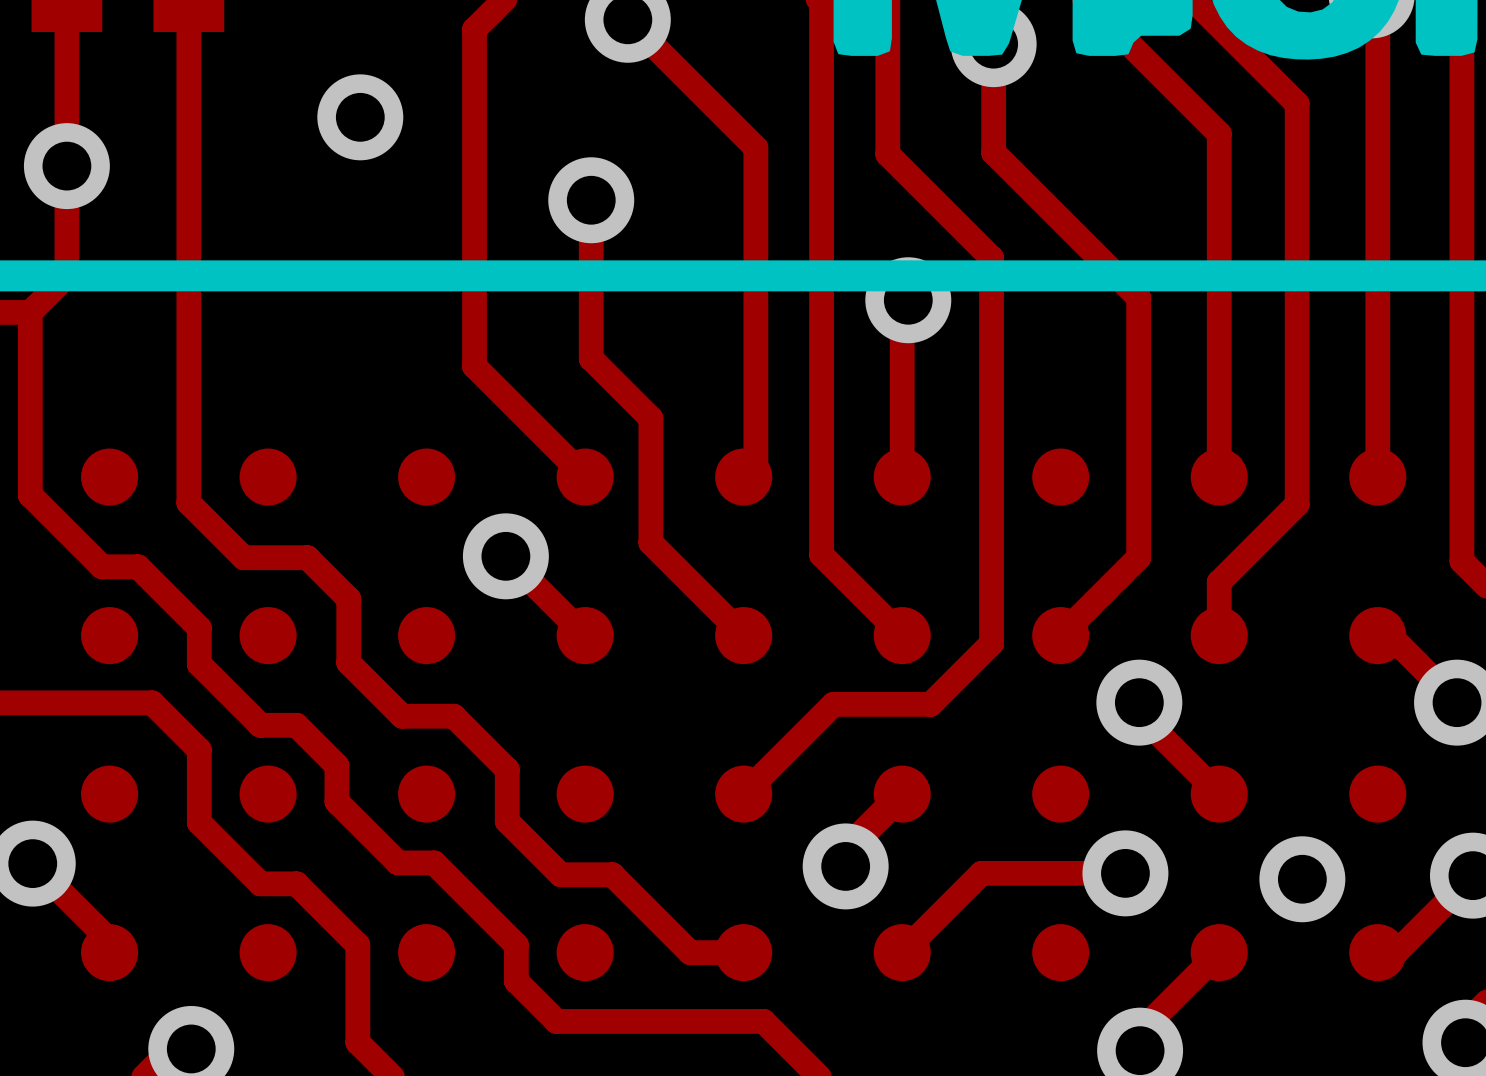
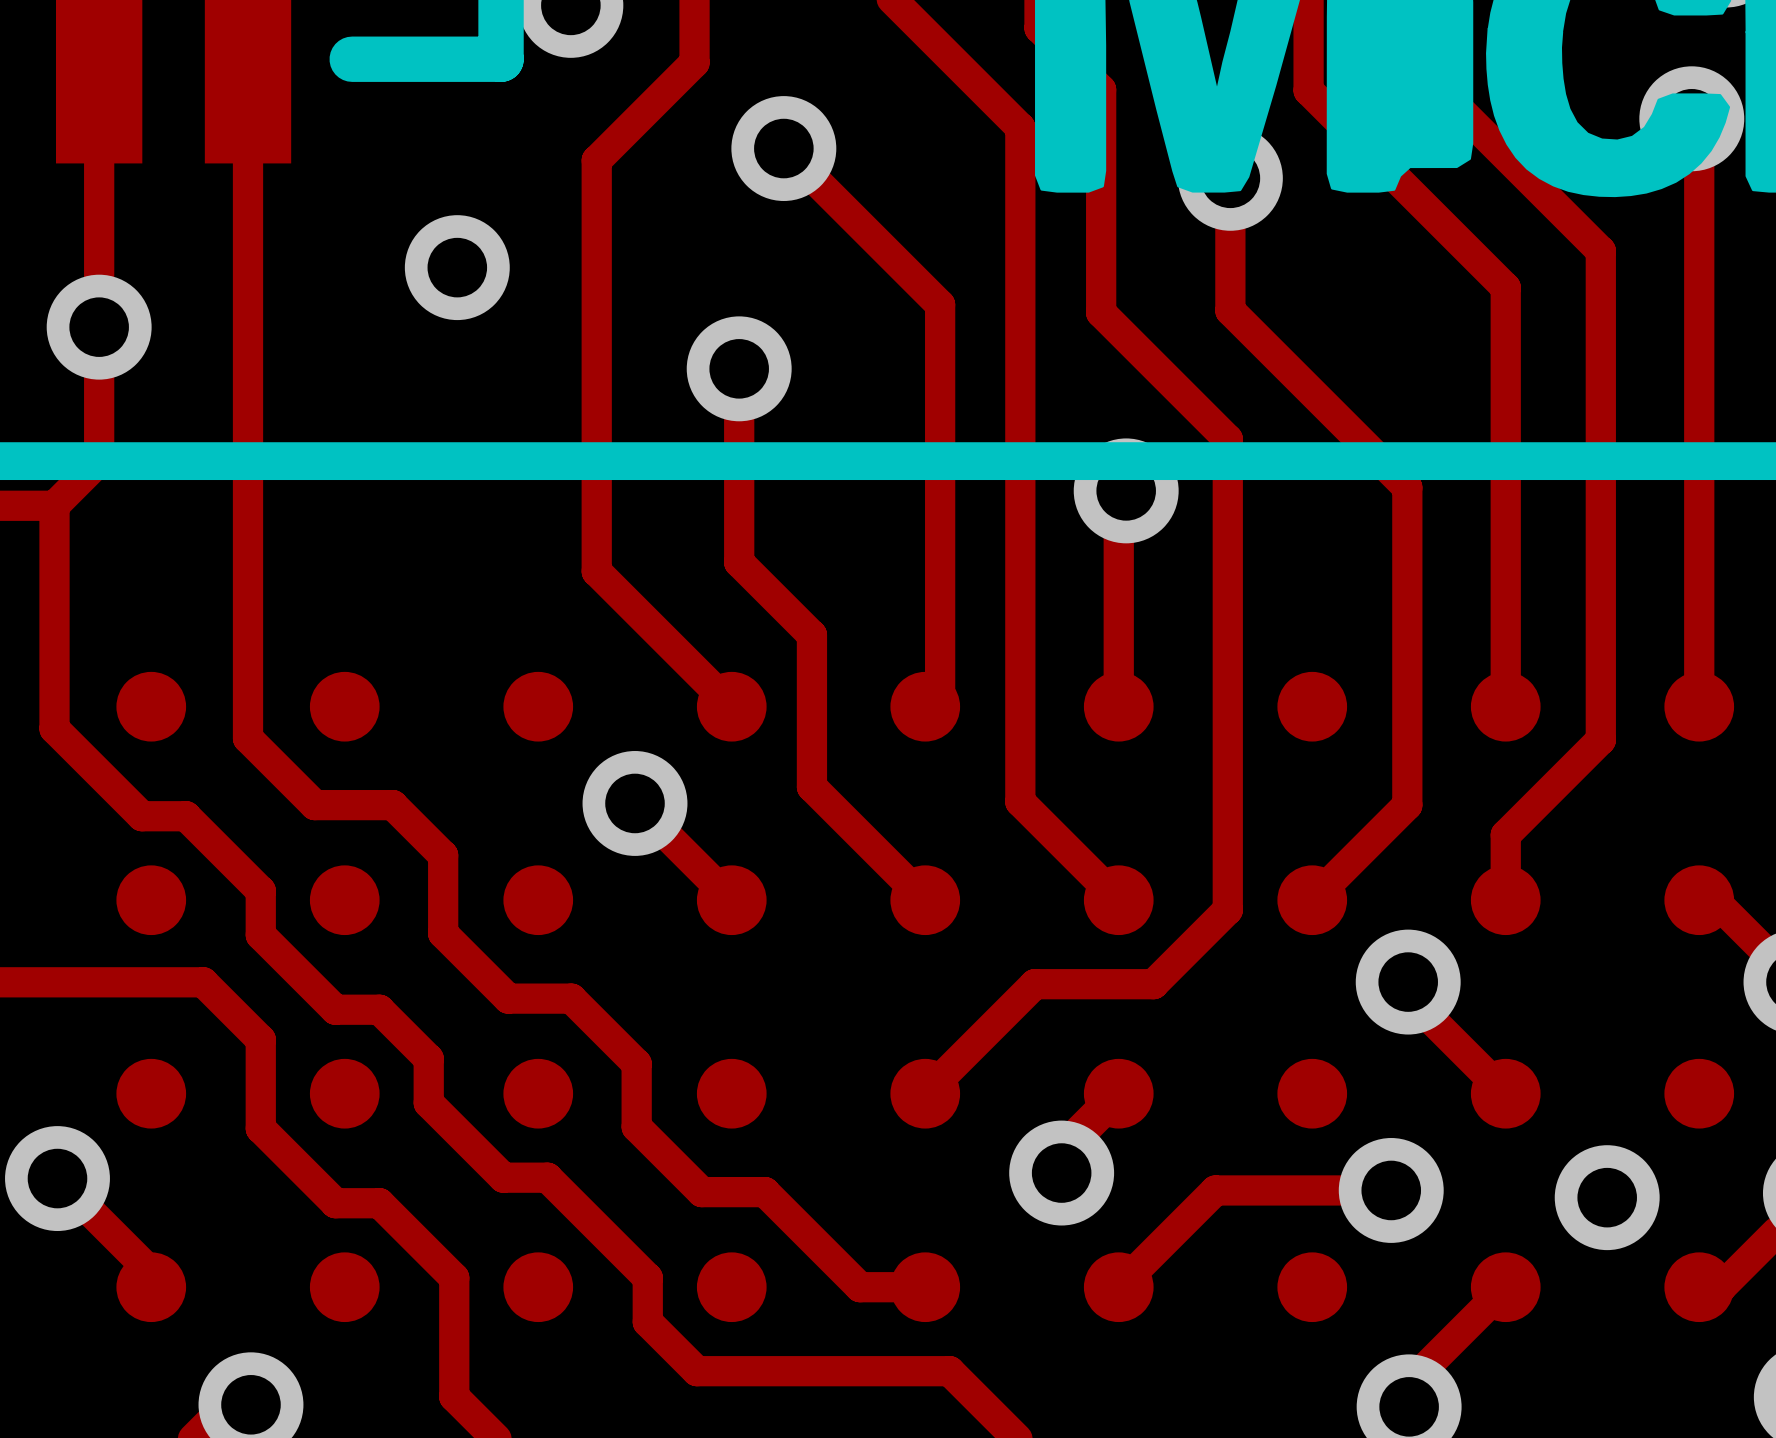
via position: (845, 866) -> (1061, 1173)

